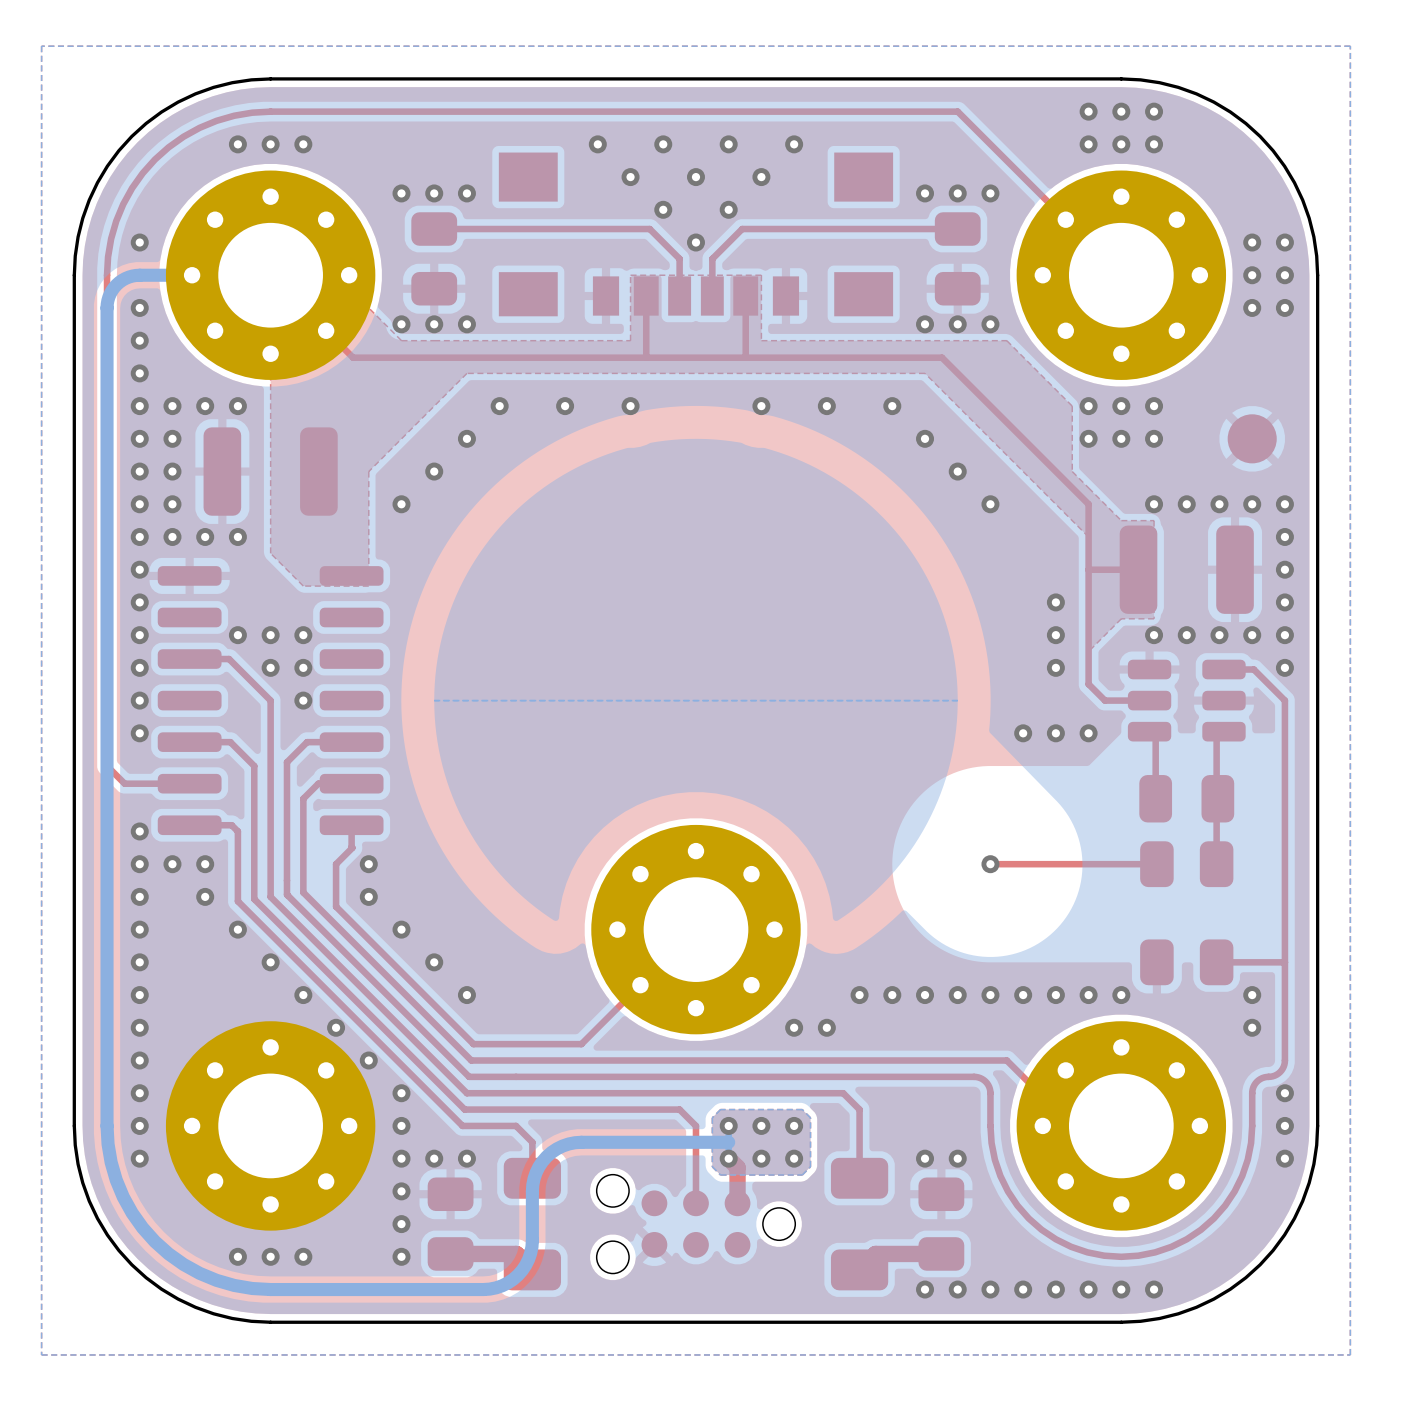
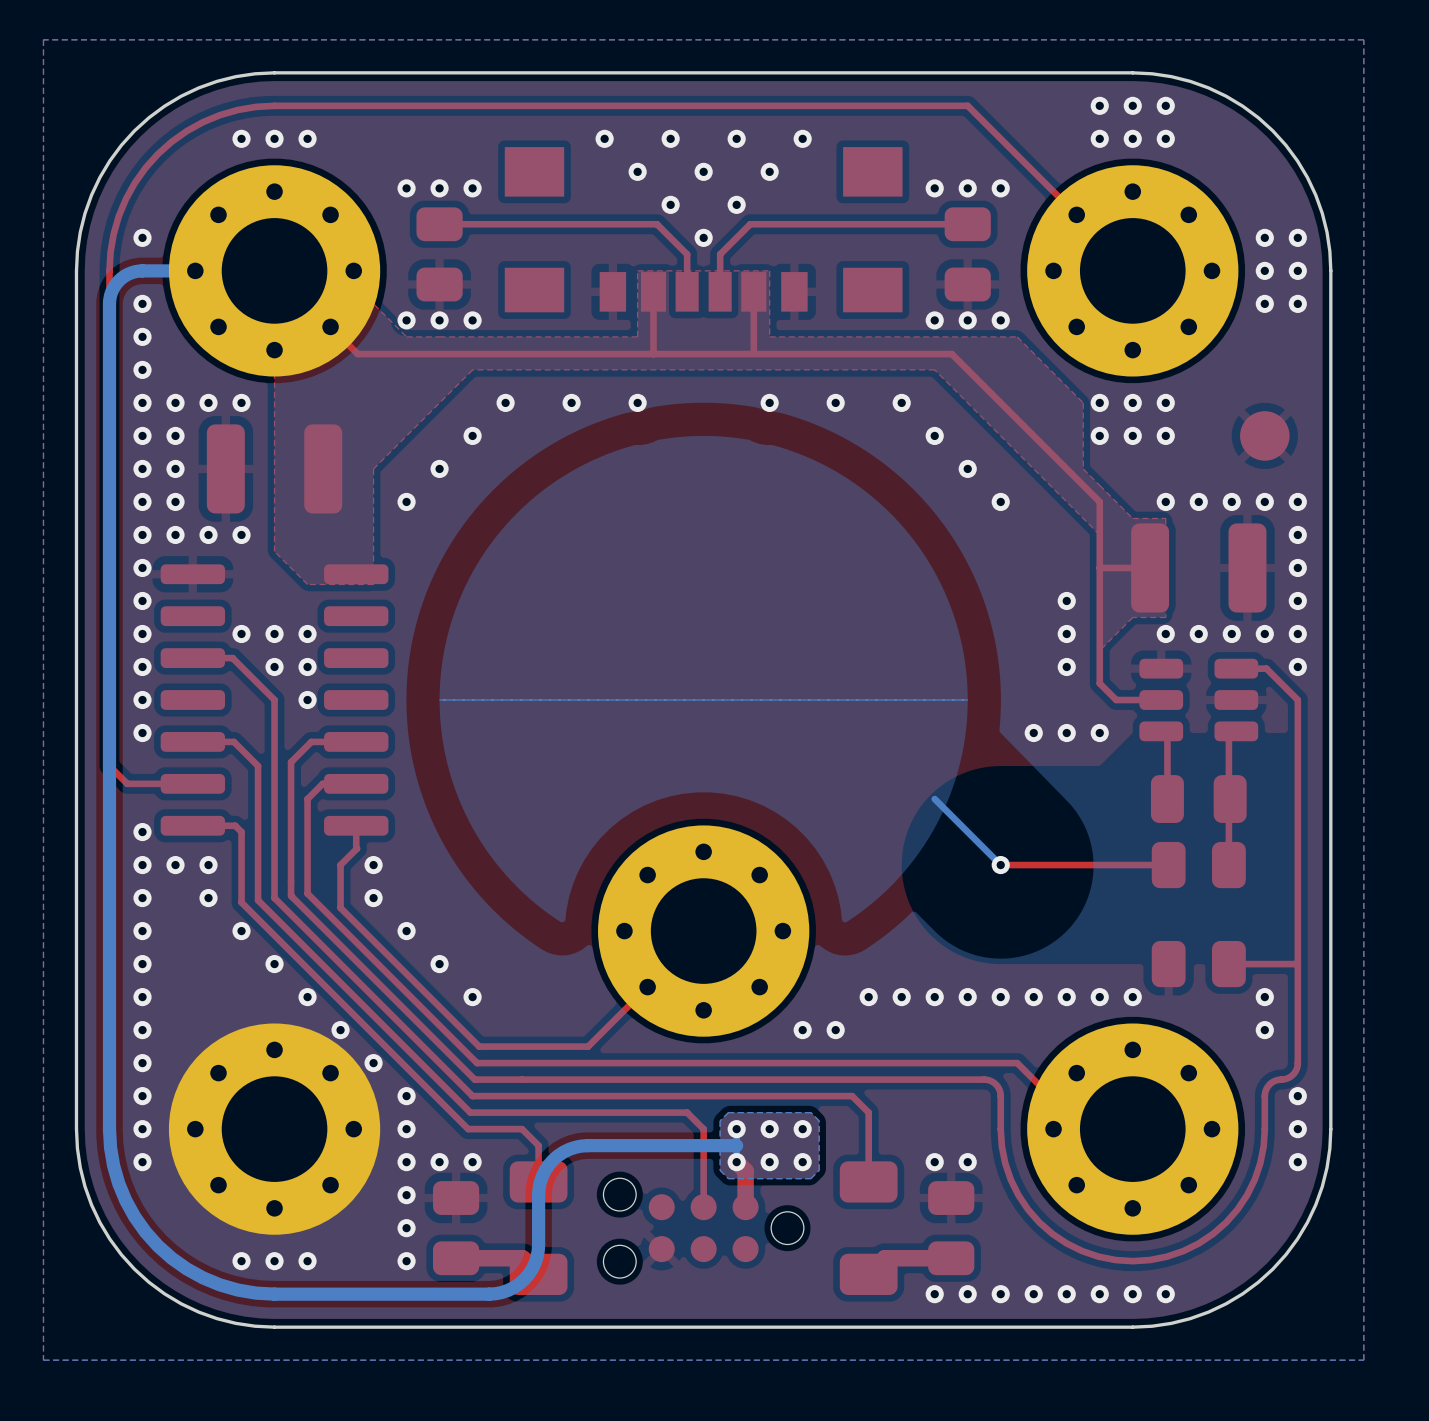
bottom track: none -> (934, 799) (1000, 865)

